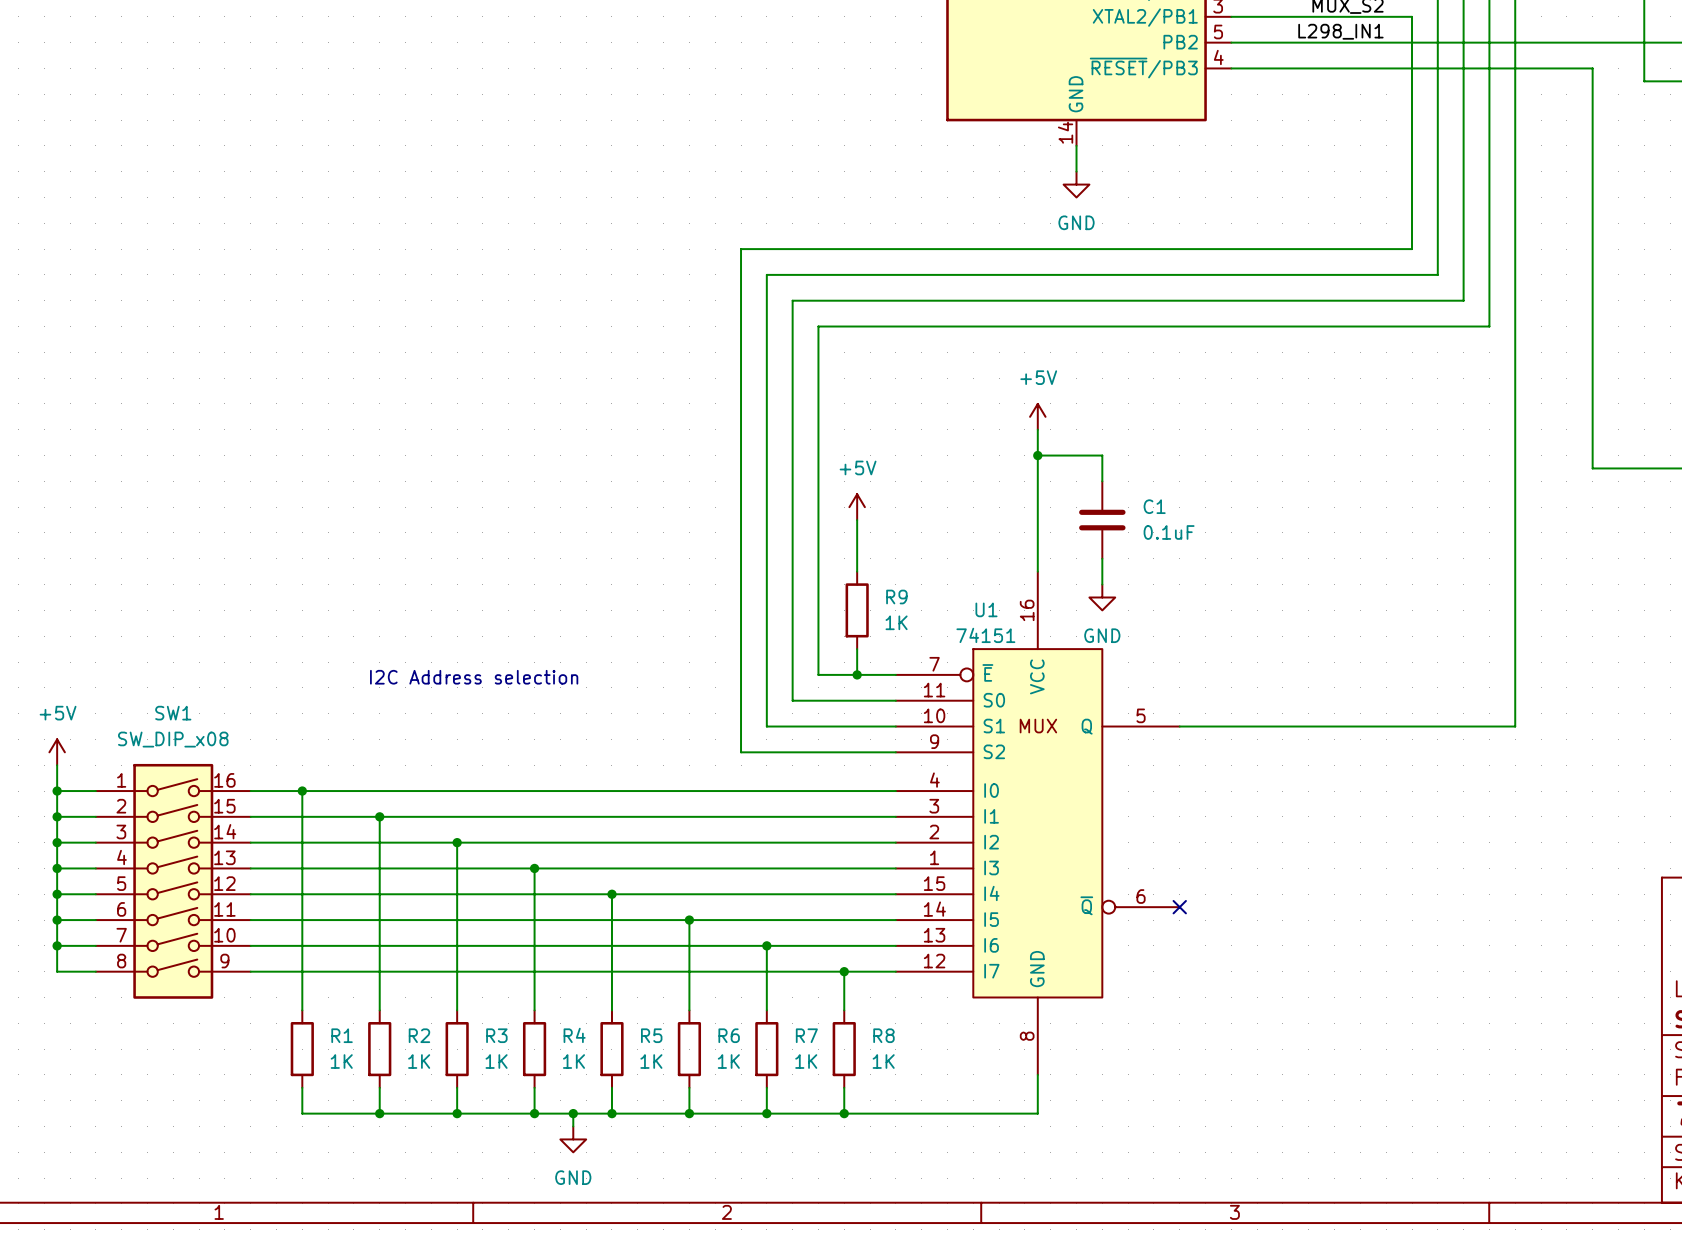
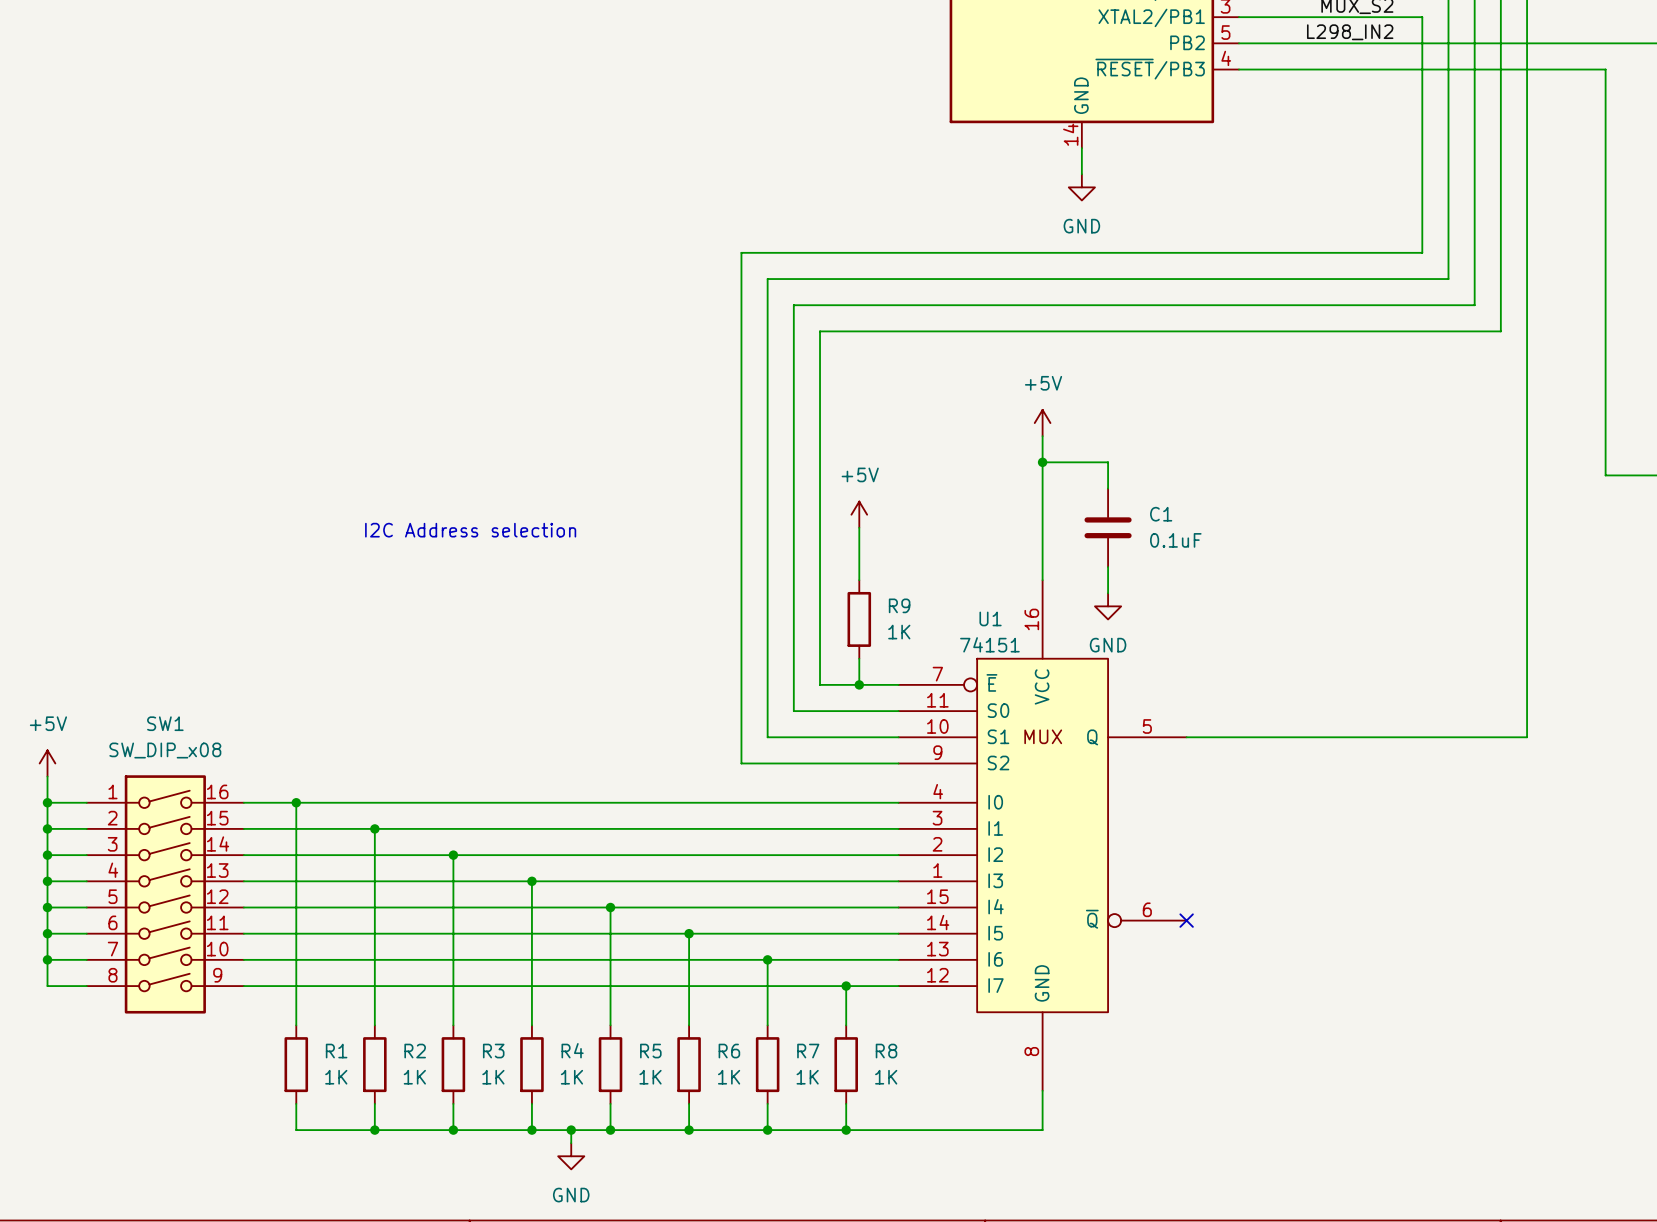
label: L298_IN1 (1340, 31) -> L298_IN2 (1350, 32)
text position: I2C Address selection (474, 677) -> I2C Address selection (470, 530)

